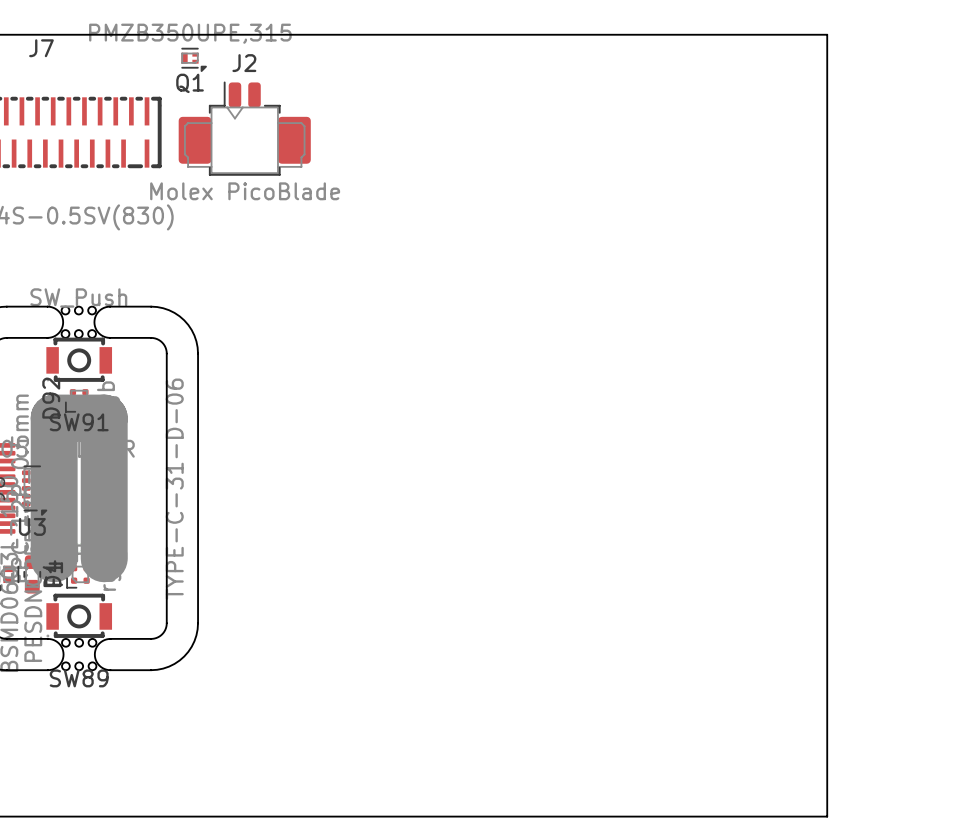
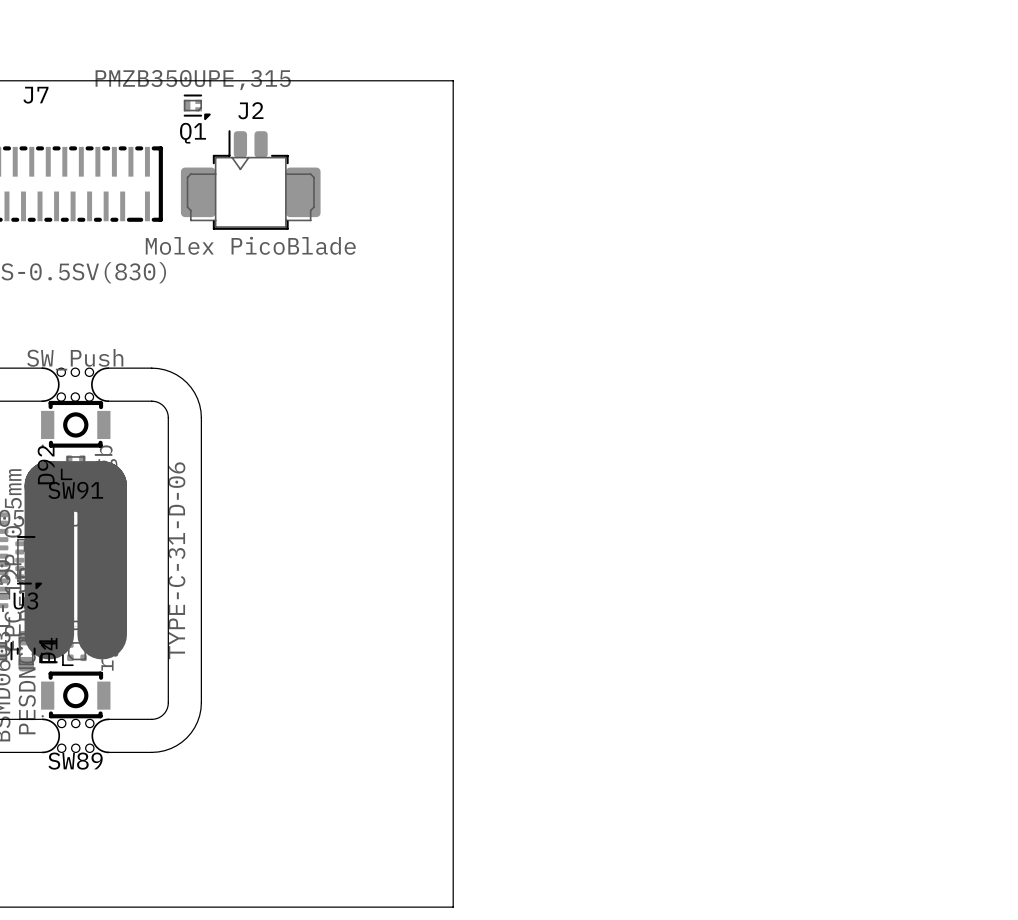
board edge: (436, 34) (827, 34) (827, 816) (436, 816) -> (453, 80) (453, 907)

